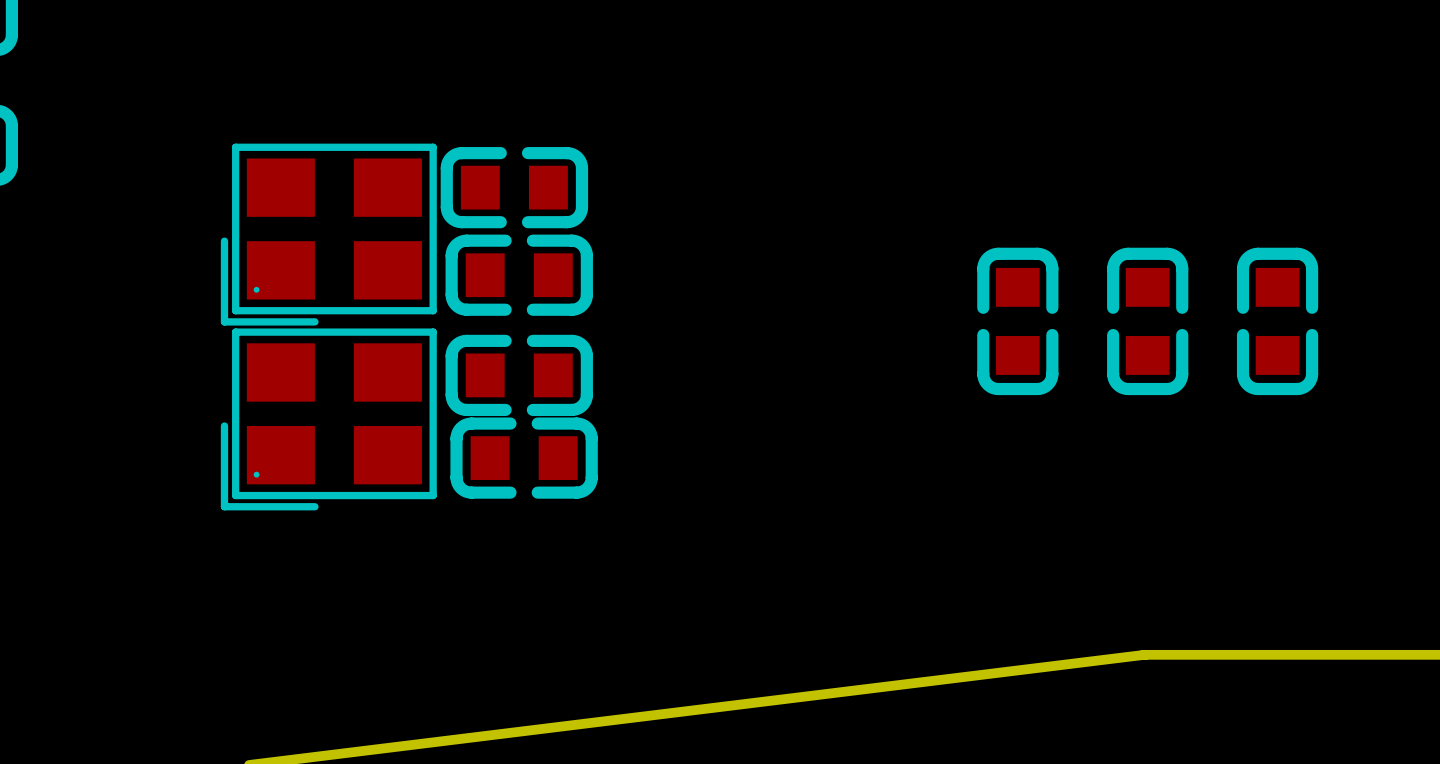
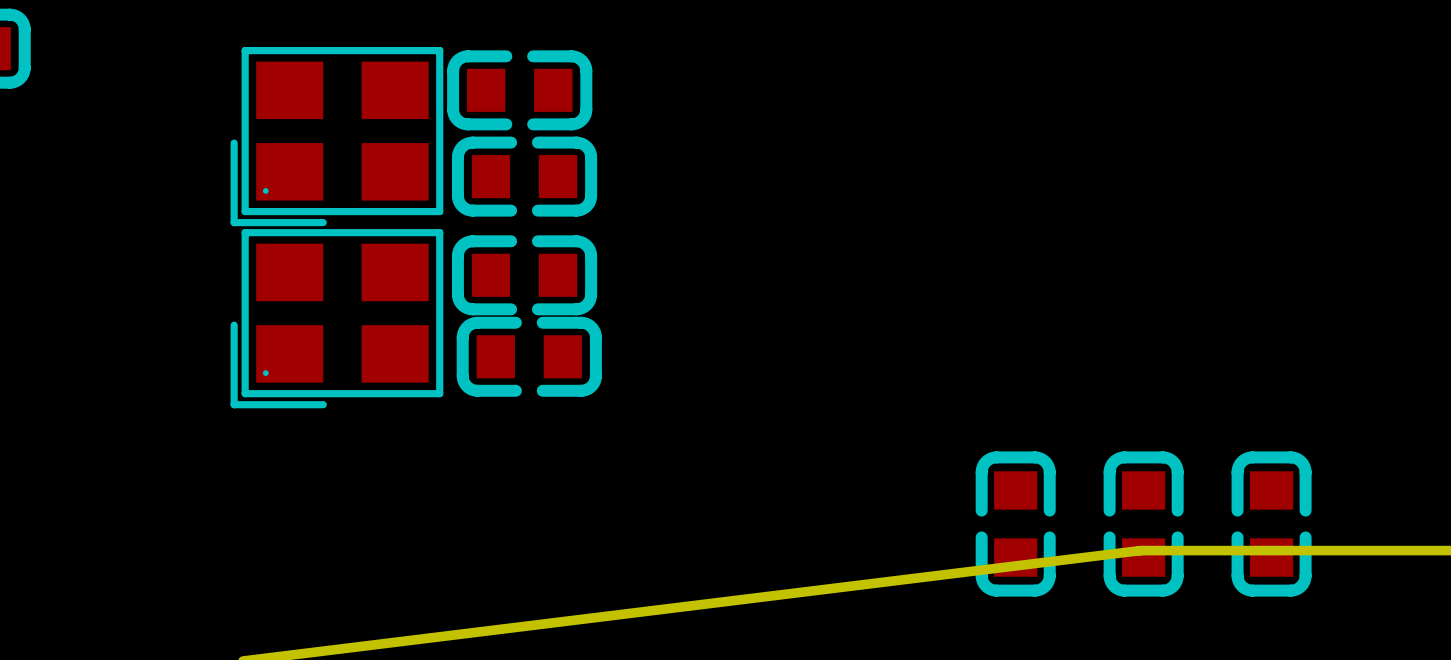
part: (1017, 321) -> none
part: (1147, 321) -> none
part: (1277, 321) -> none
part: none -> (1015, 524)
part: none -> (1143, 524)
part: none -> (1271, 524)

